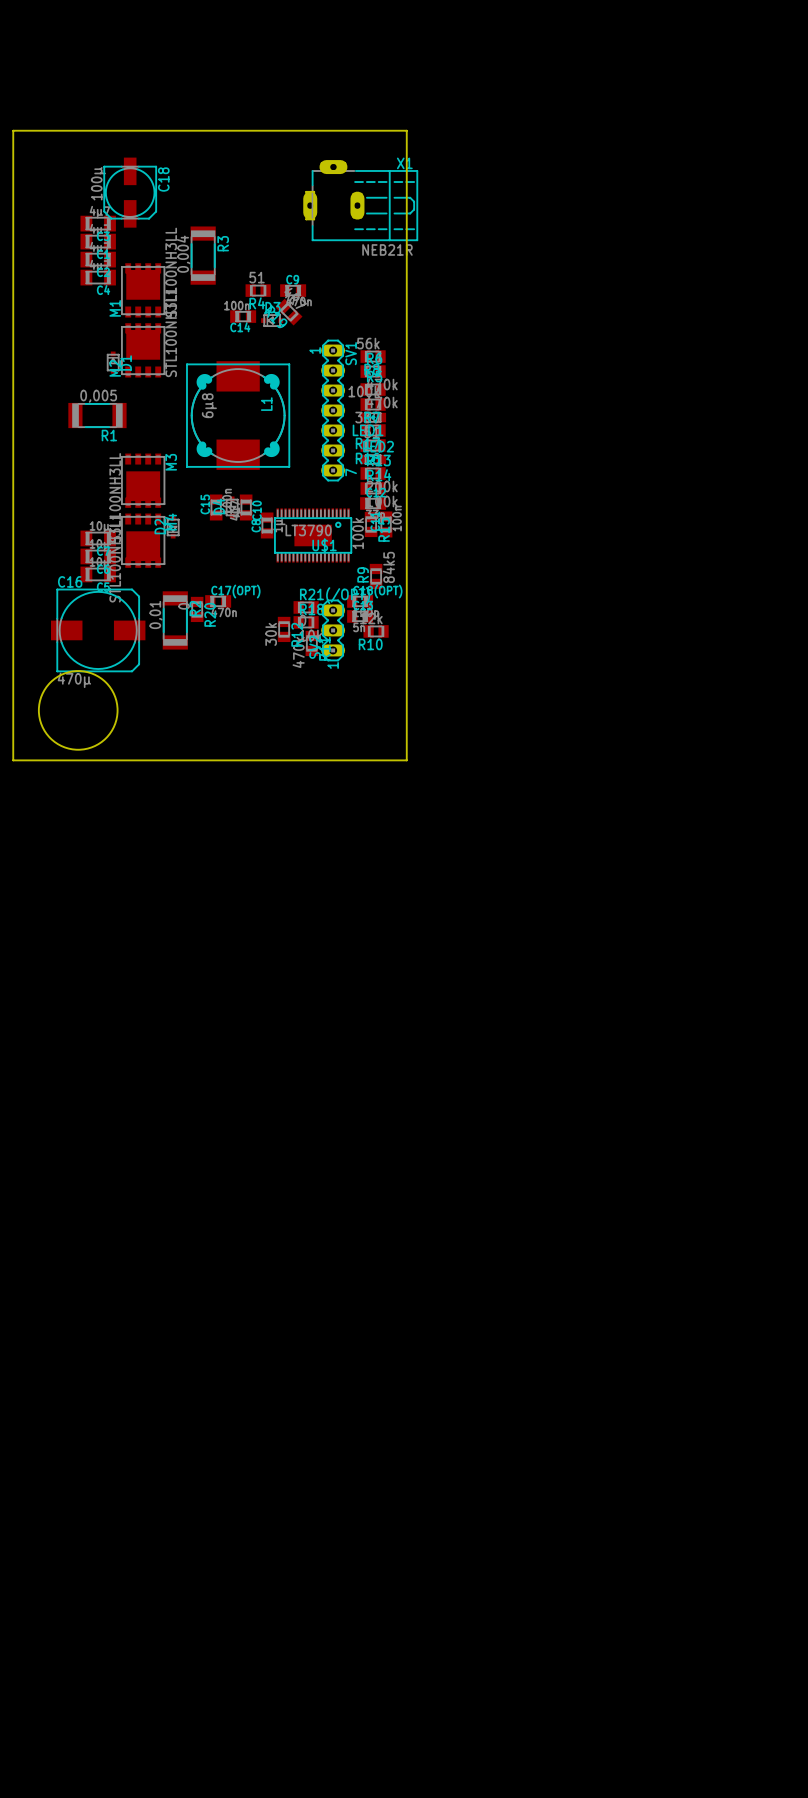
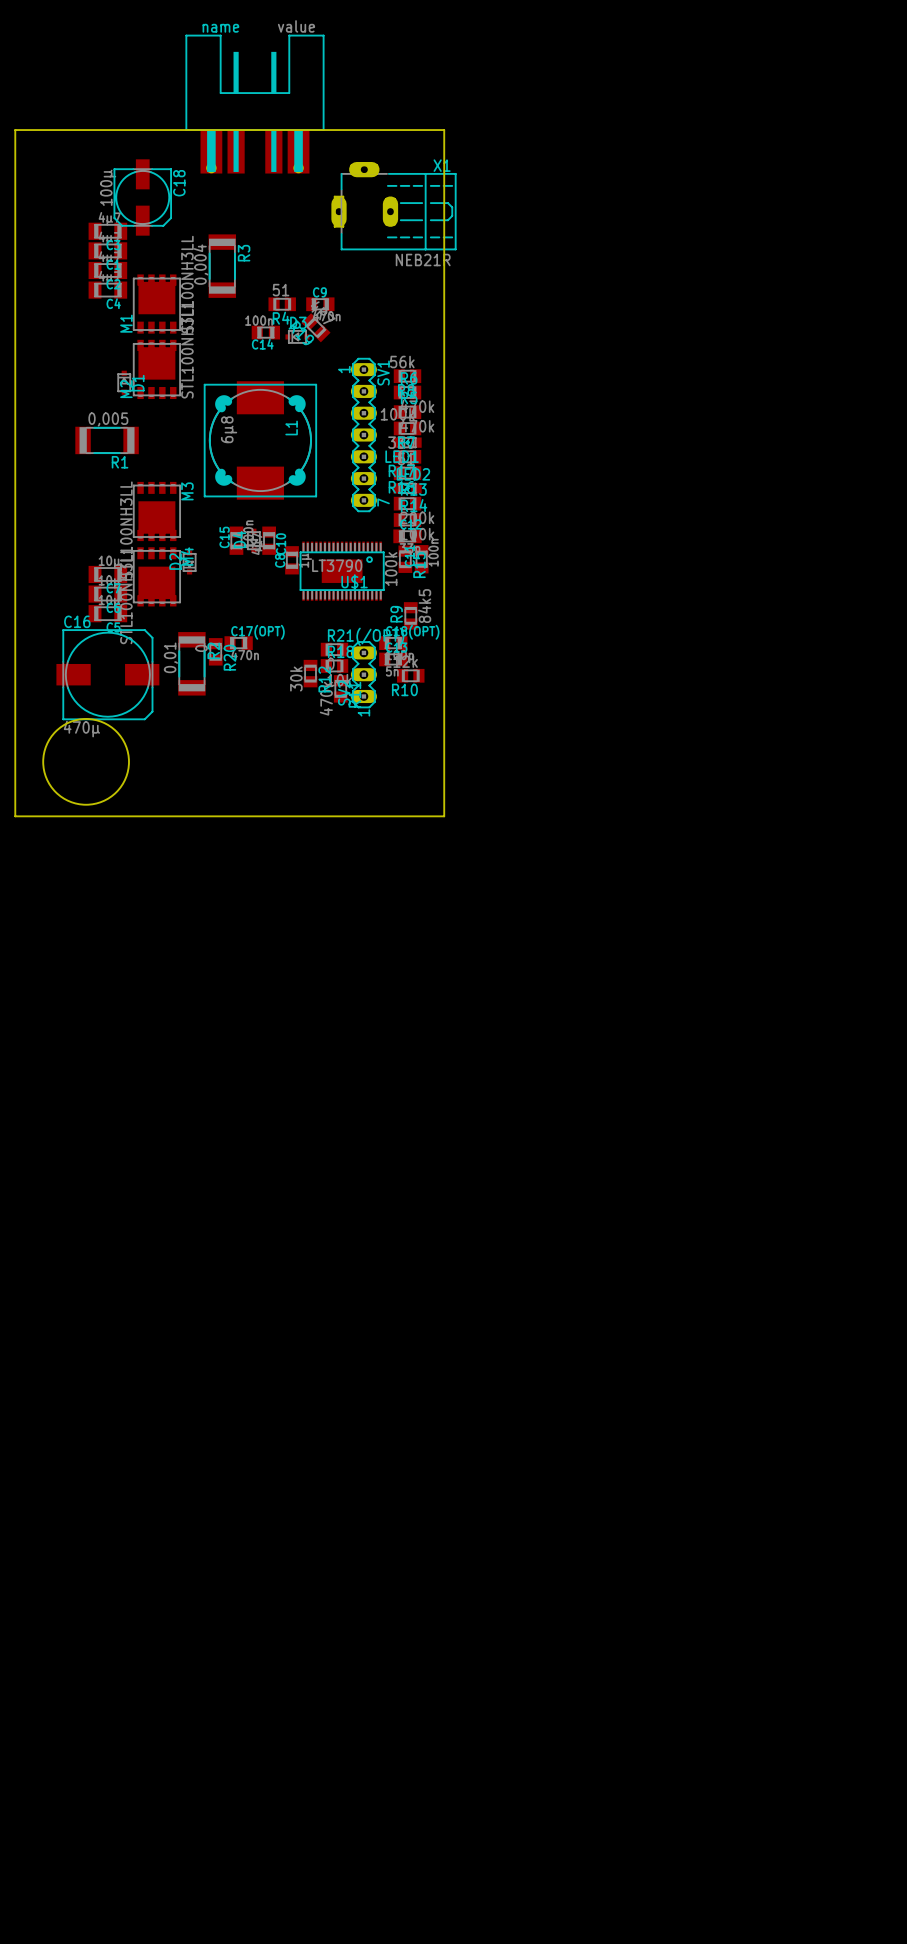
part: none -> (254, 104)

